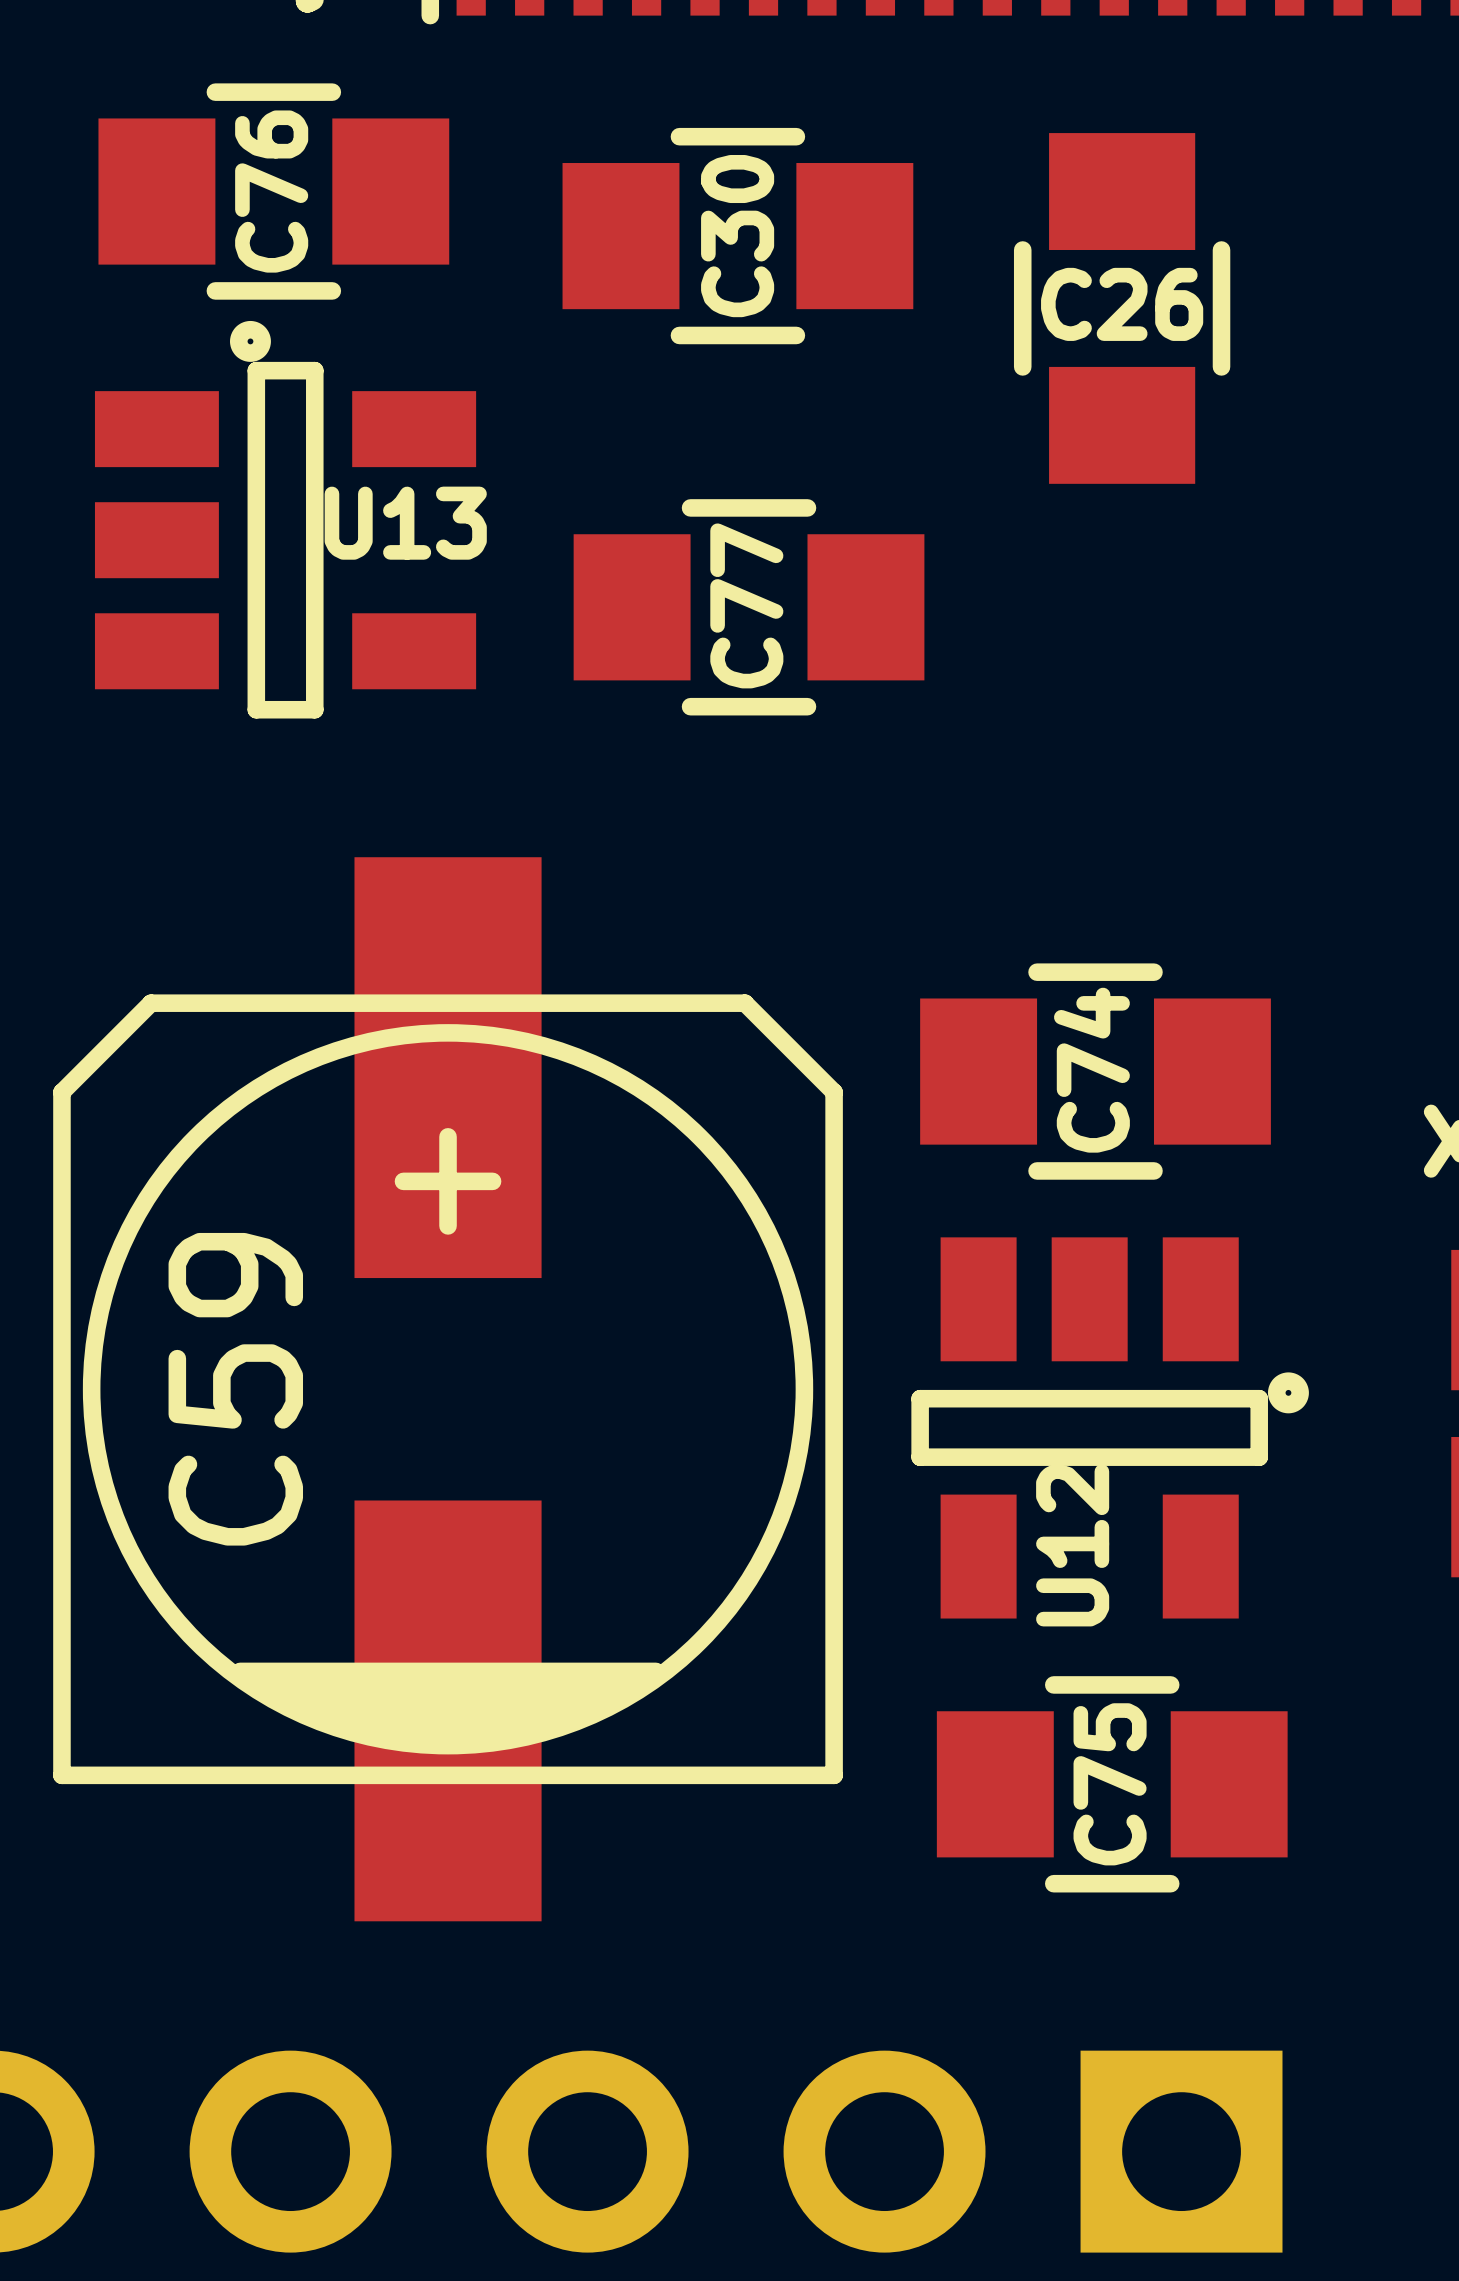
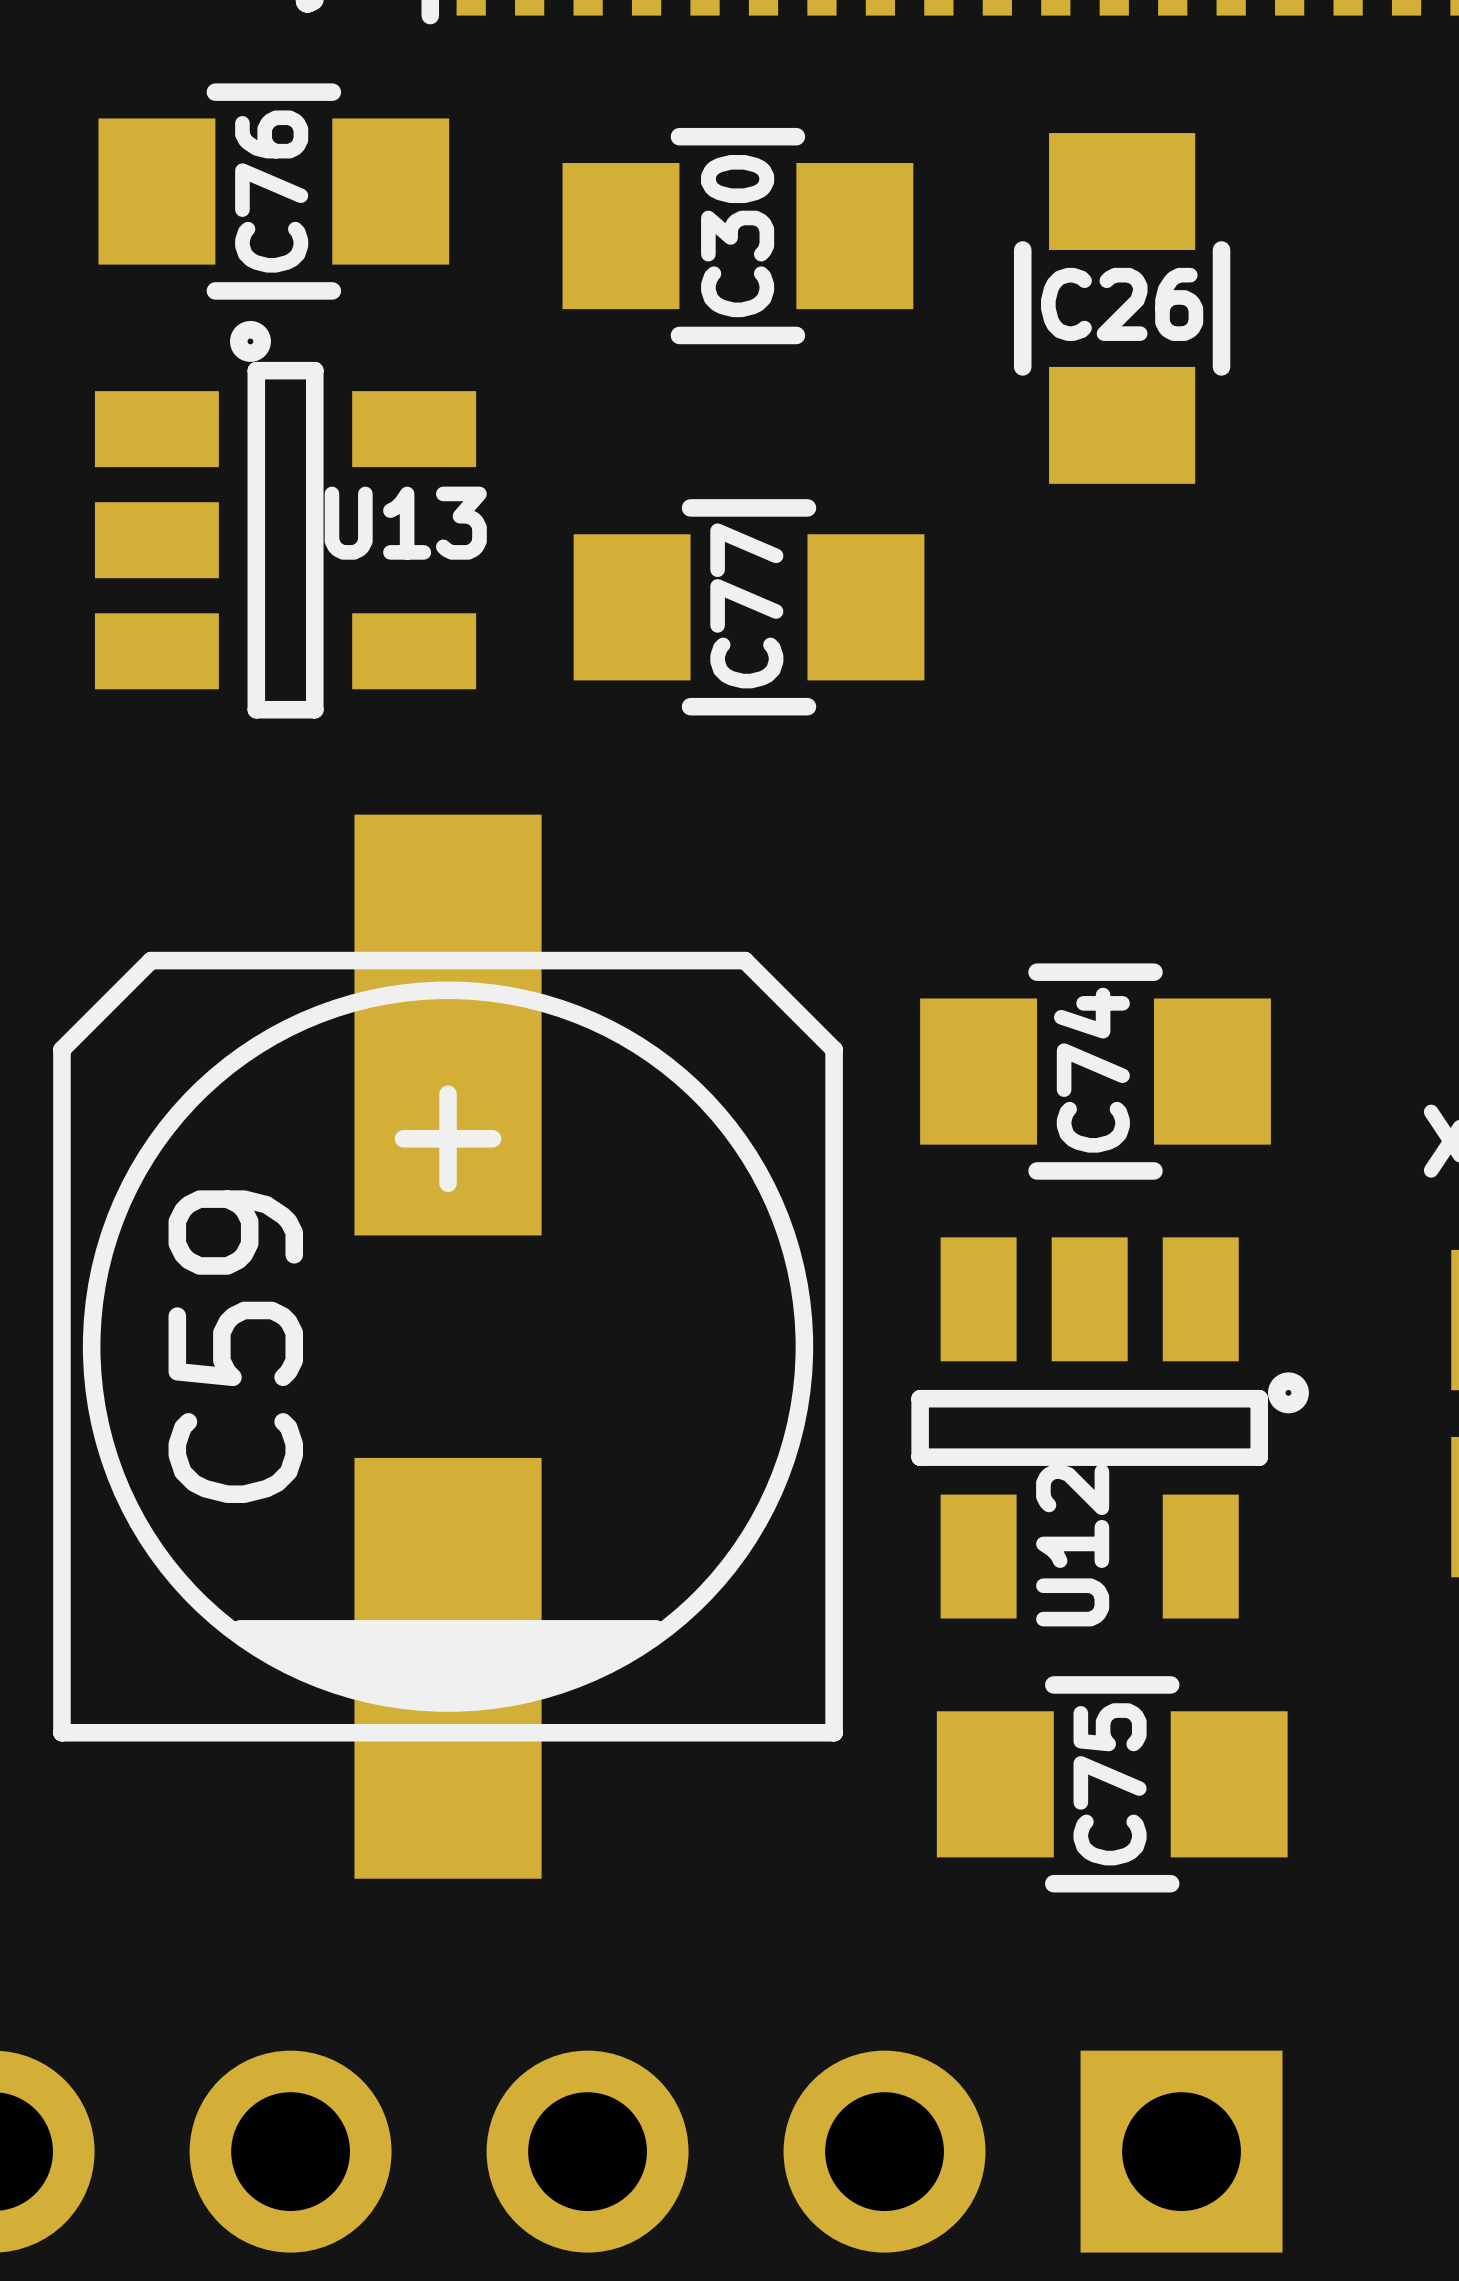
C59 position: (448, 1389) -> (448, 1346)

